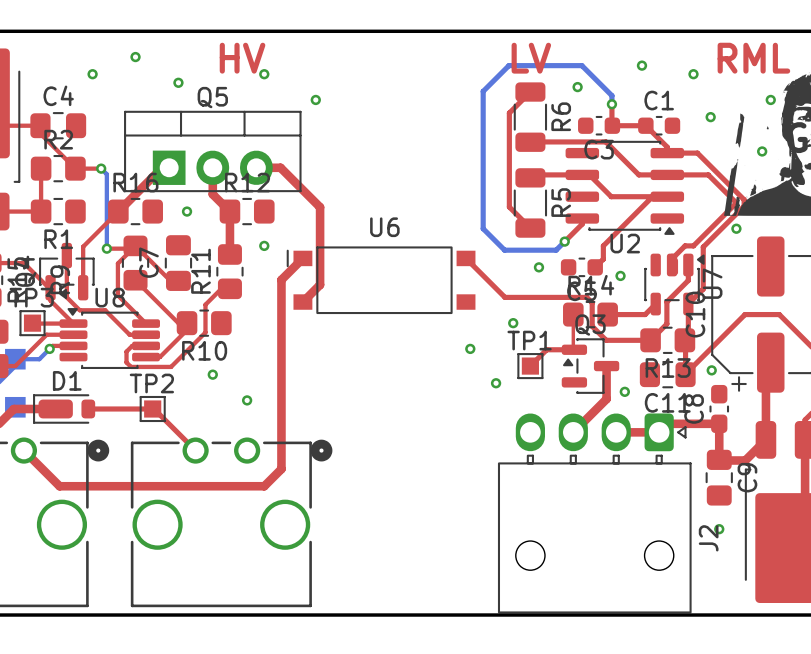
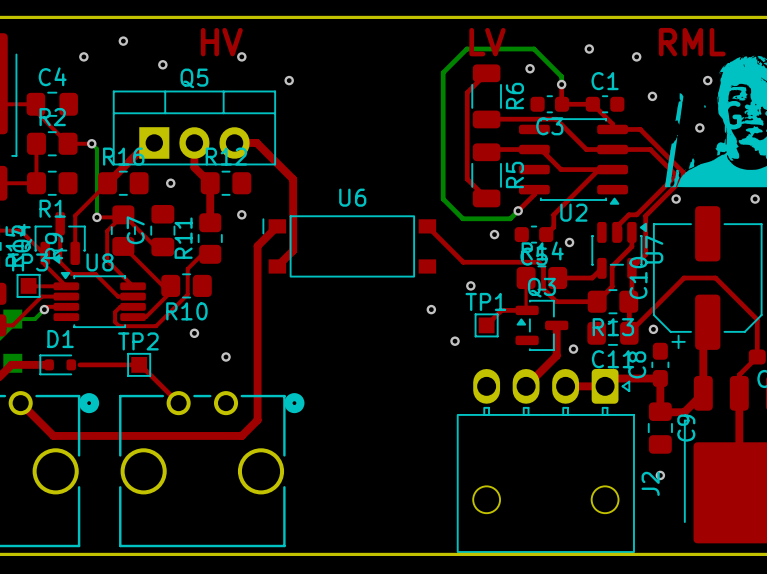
D1 footprint: [33, 394, 96, 424] -> [39, 354, 76, 376]

